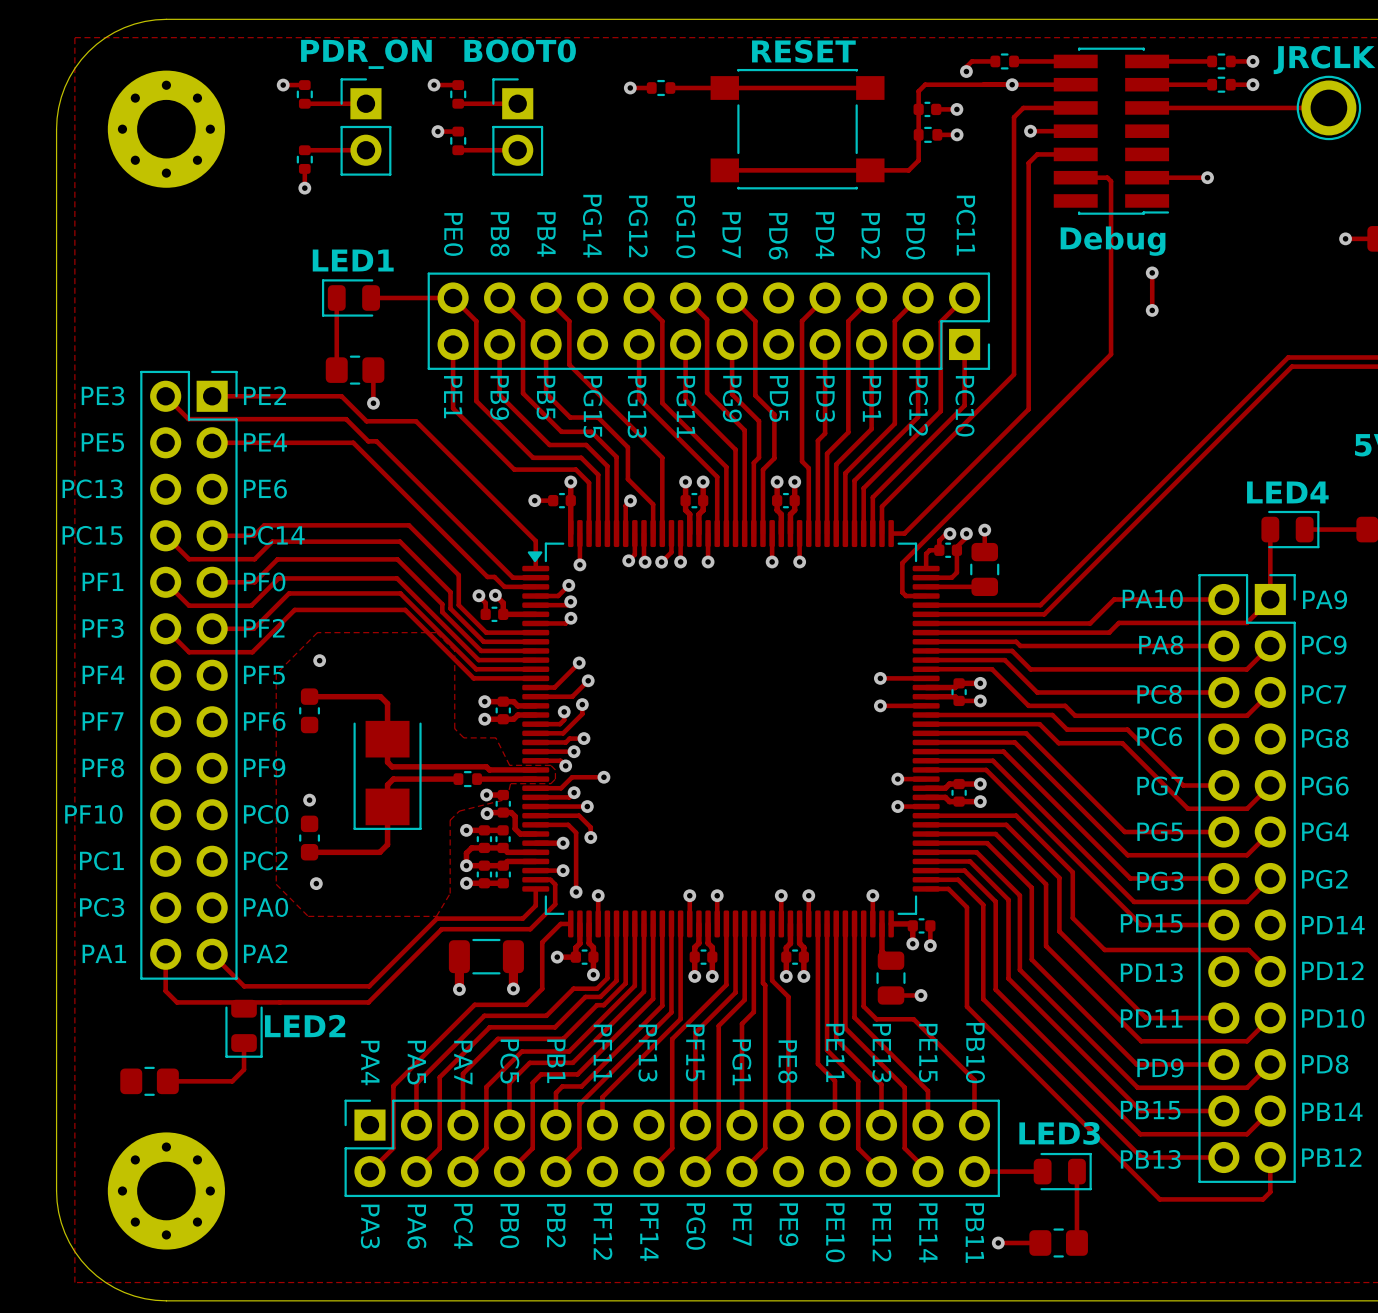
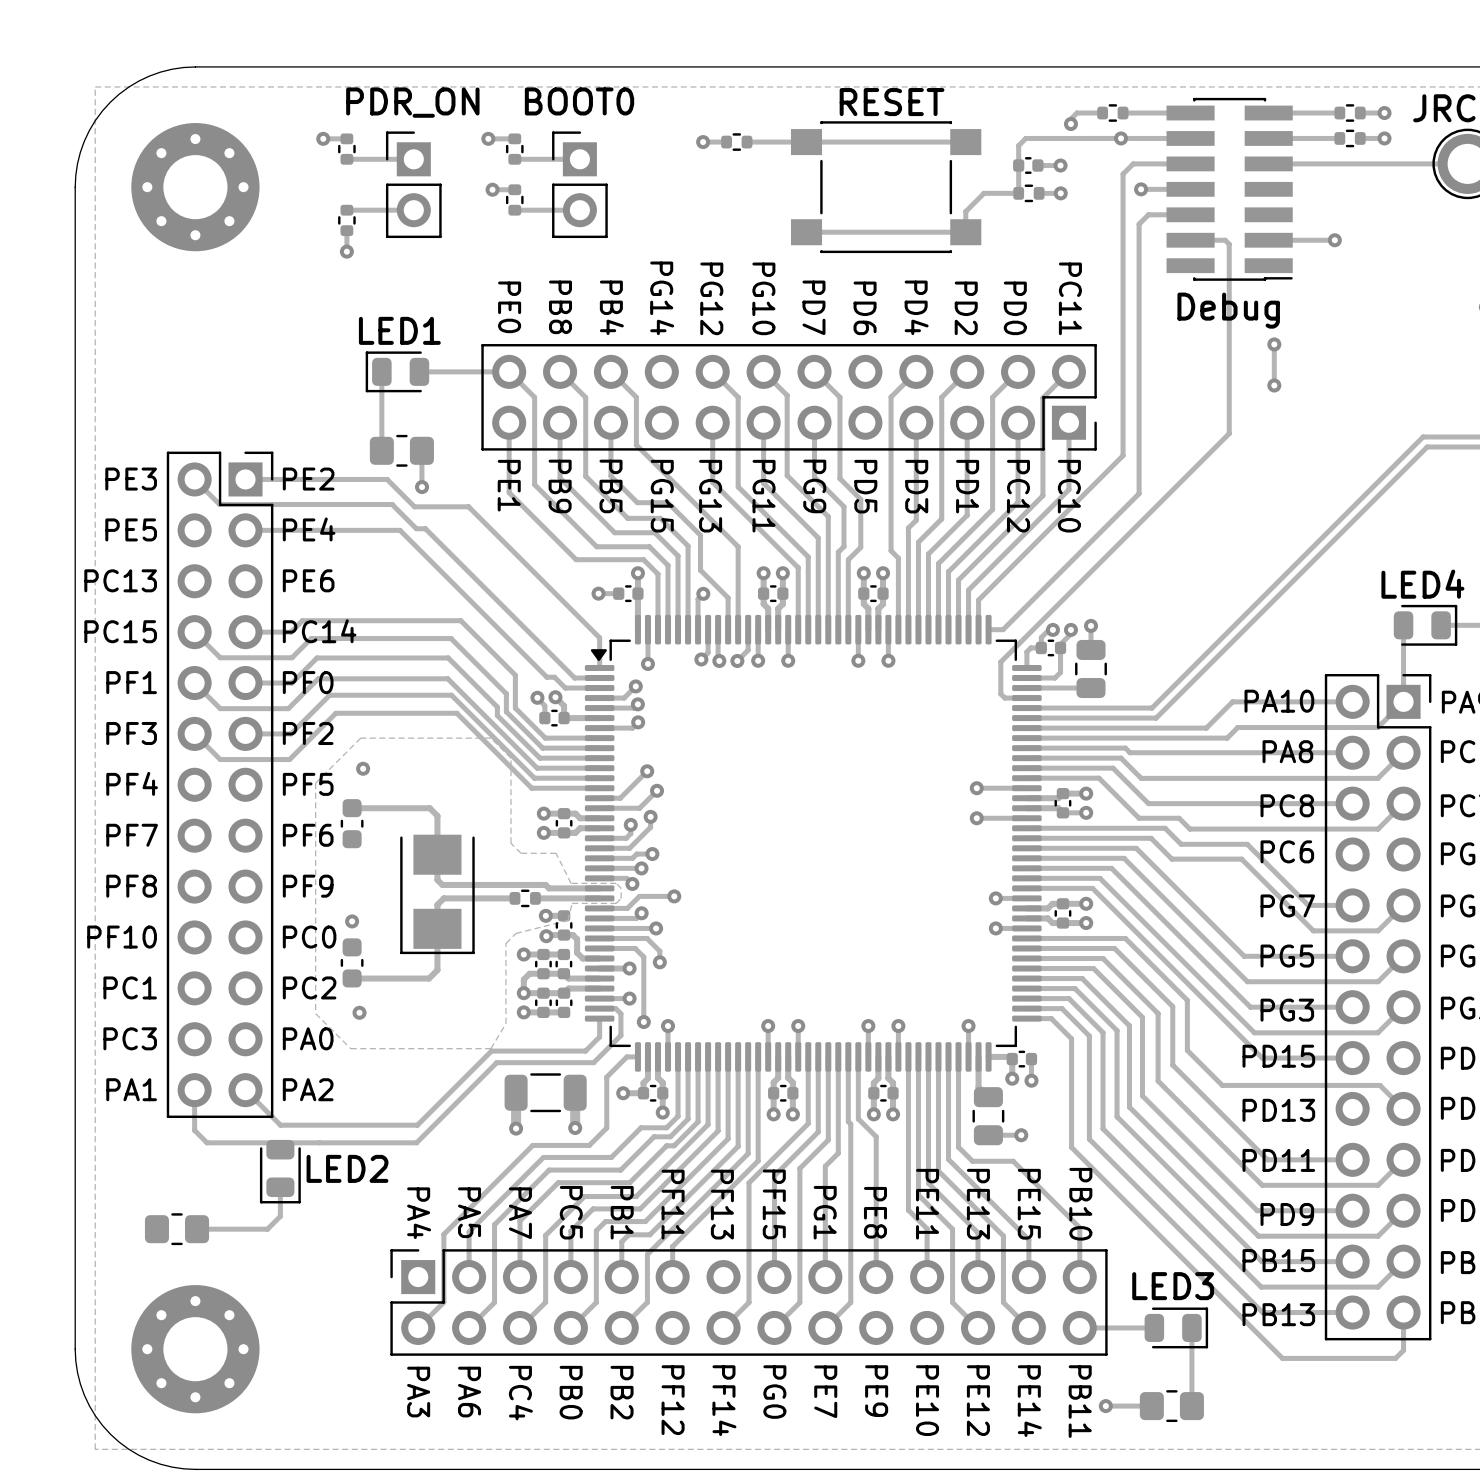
track: (918, 134) (918, 160) (908, 170) (870, 170) -> (1018, 193) (984, 193) (965, 211) (965, 232)

